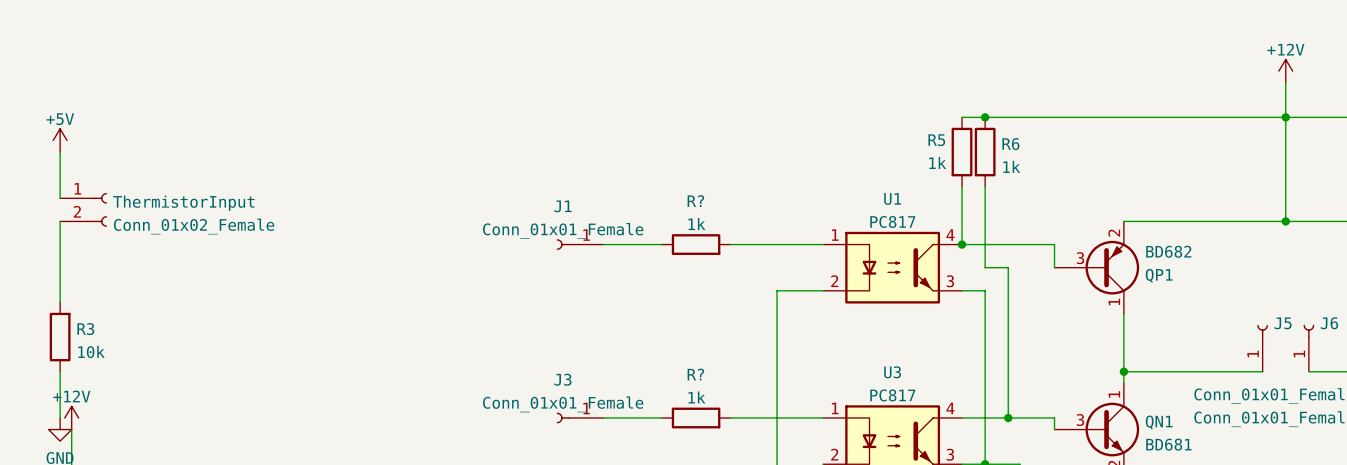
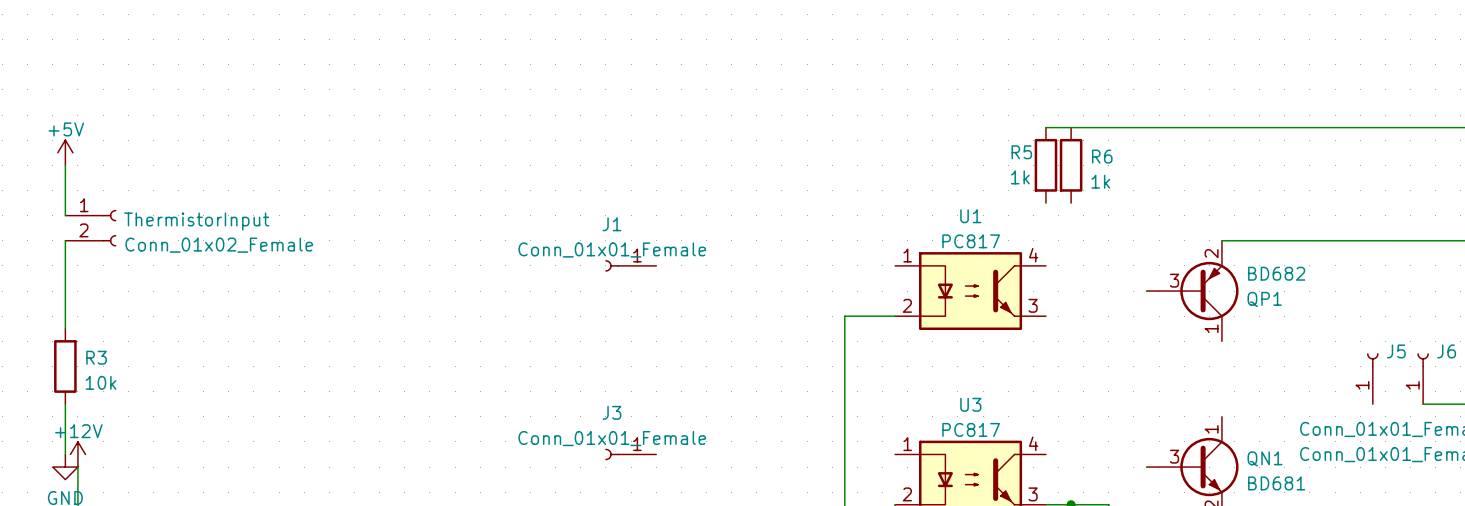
power symbol: +12V (1285, 71) -> none
wire: (1285, 82) (1285, 221) -> none
junction: (985, 117) -> none
junction: (1285, 117) -> none
wire: (962, 186) (962, 244) (1054, 244) (1054, 267) -> none
wire: (985, 186) (985, 267) (1008, 267) (1008, 418) -> none
junction: (1285, 221) -> none
wire: (603, 244) (661, 244) -> none
R?: 1k (696, 244) -> none
wire: (730, 244) (823, 244) -> none
junction: (962, 244) -> none
wire: (962, 290) (985, 290) (985, 464) -> none
wire: (1123, 313) (1123, 383) -> none
wire: (1123, 371) (1262, 371) -> none
junction: (1123, 371) -> none
wire: (603, 418) (661, 418) -> none
R?: 1k (696, 418) -> none
wire: (730, 418) (823, 418) -> none
wire: (962, 418) (1054, 418) (1054, 429) -> none
junction: (1008, 418) -> none

